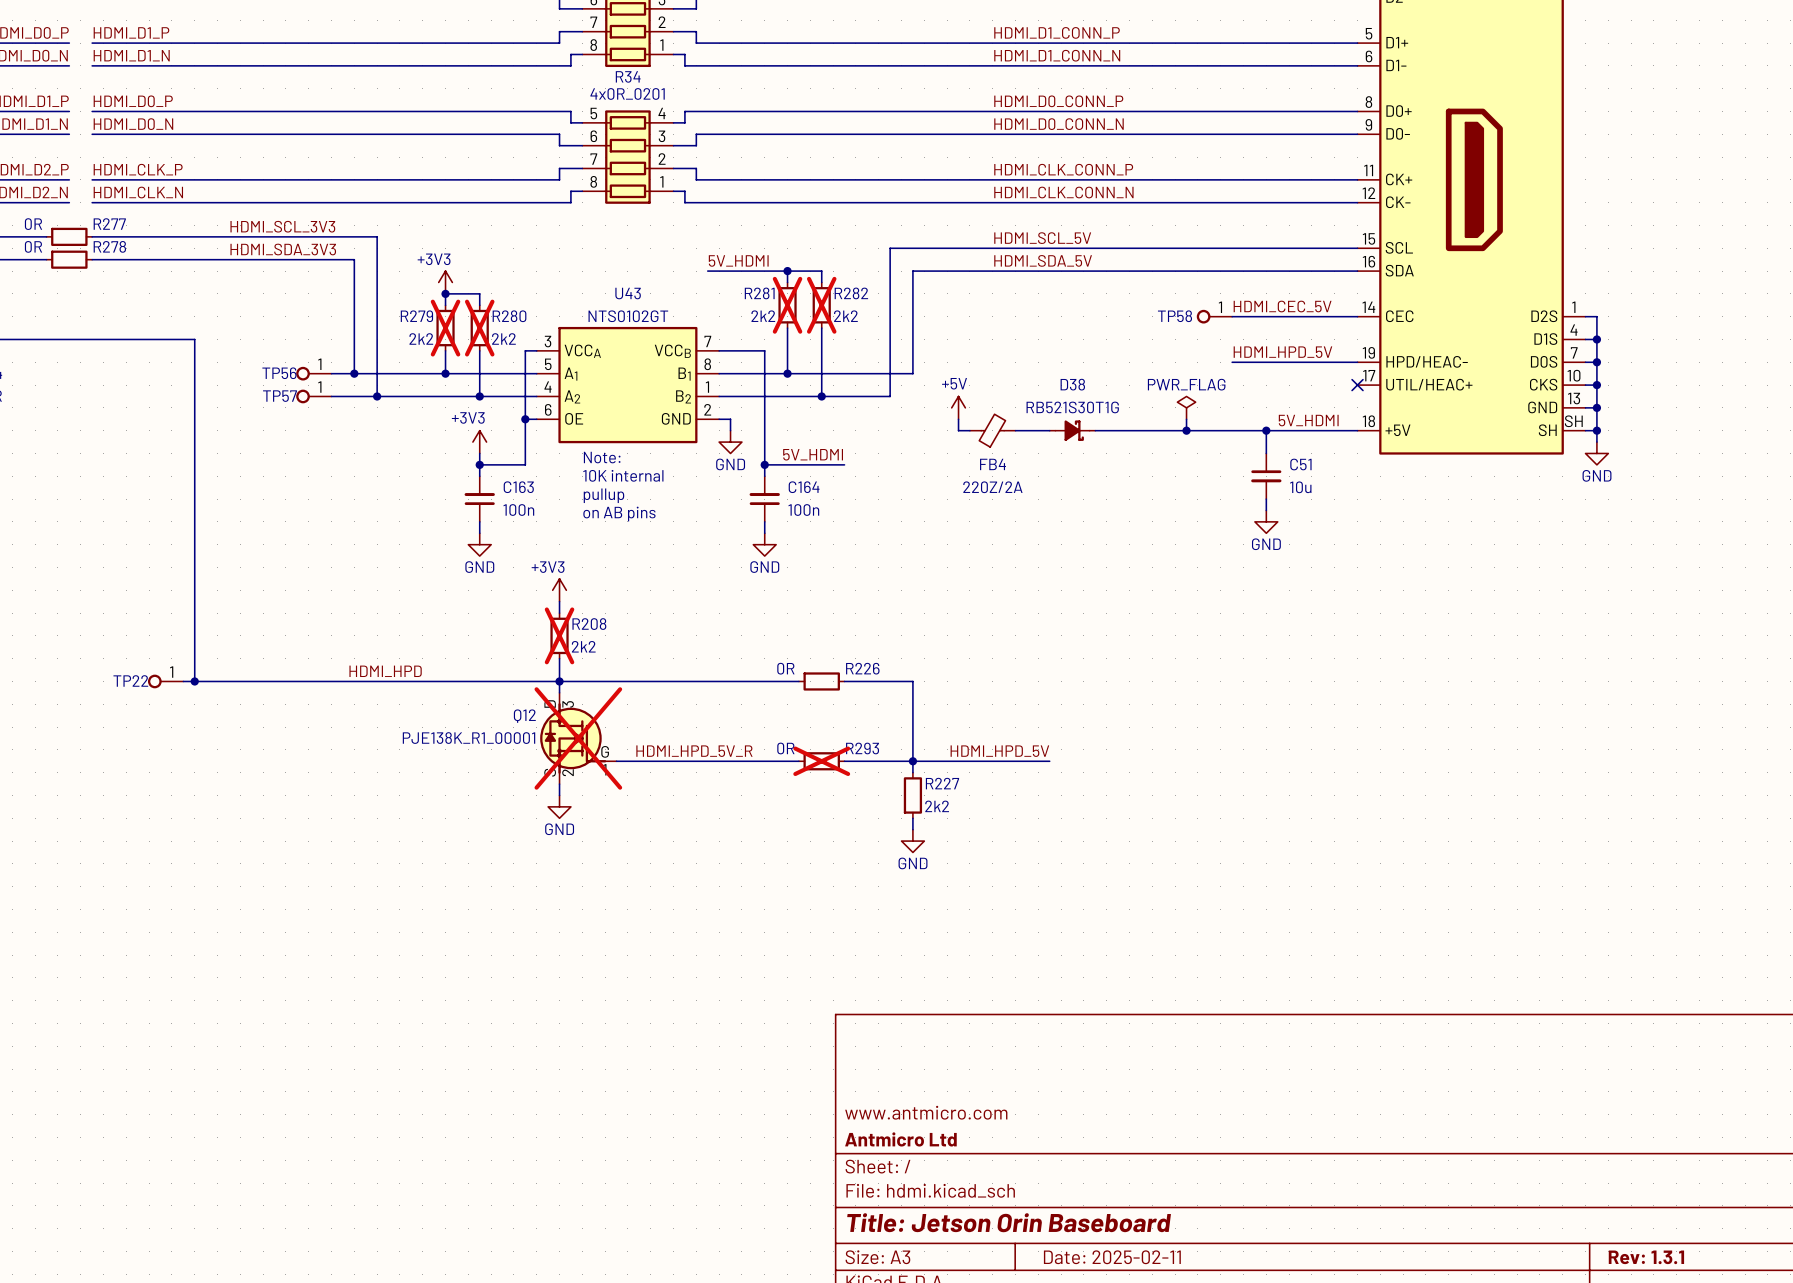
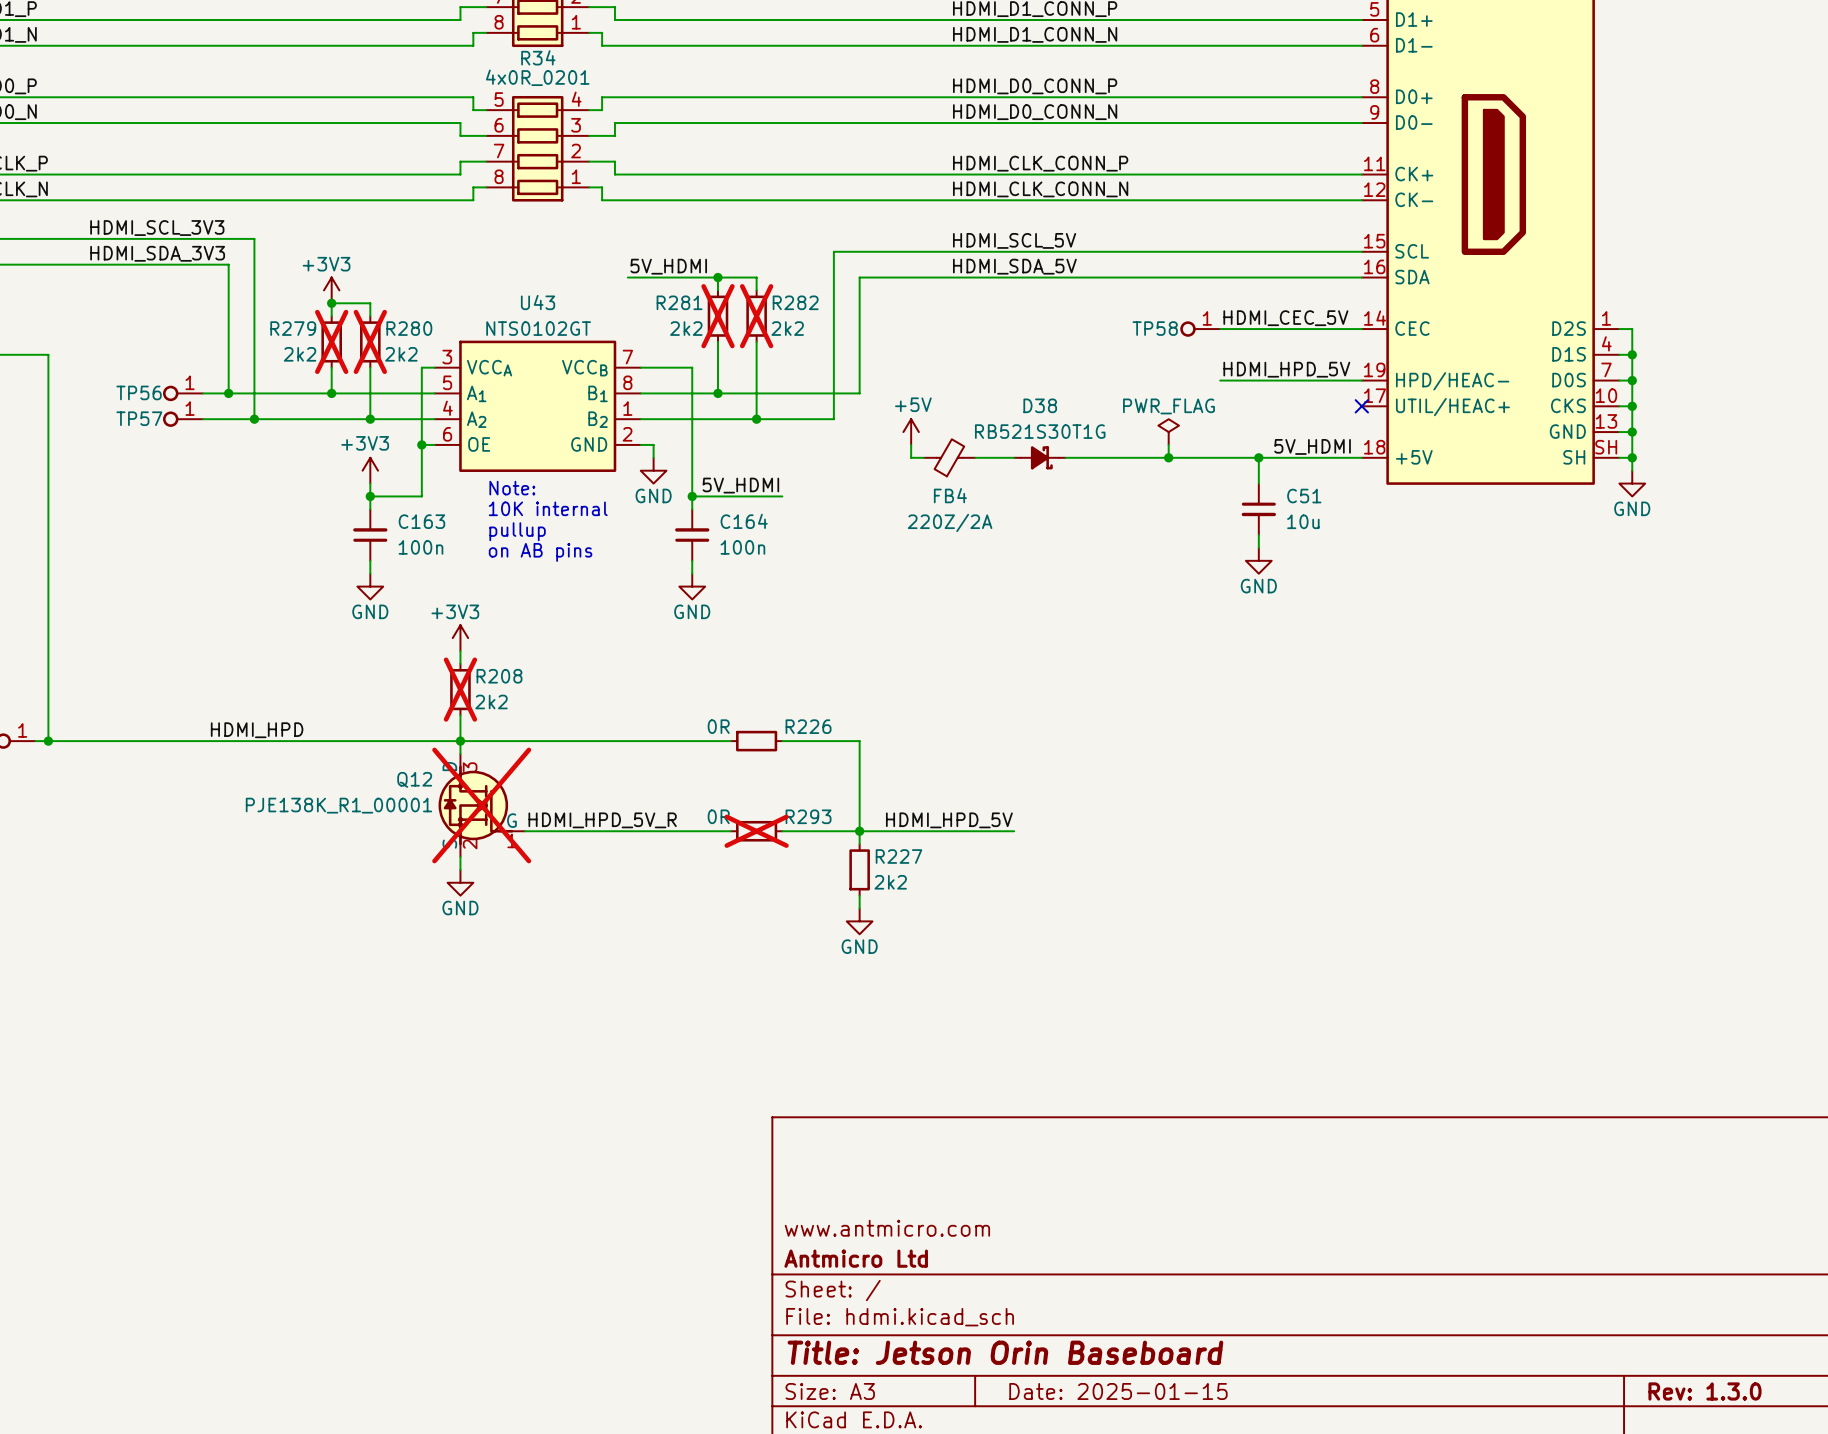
title block: Date: 2025-02-11 (1112, 1257) -> Date: 2025-01-15 (1118, 1391)
title block: Rev: 1.3.1 (1646, 1257) -> Rev: 1.3.0 (1704, 1391)

